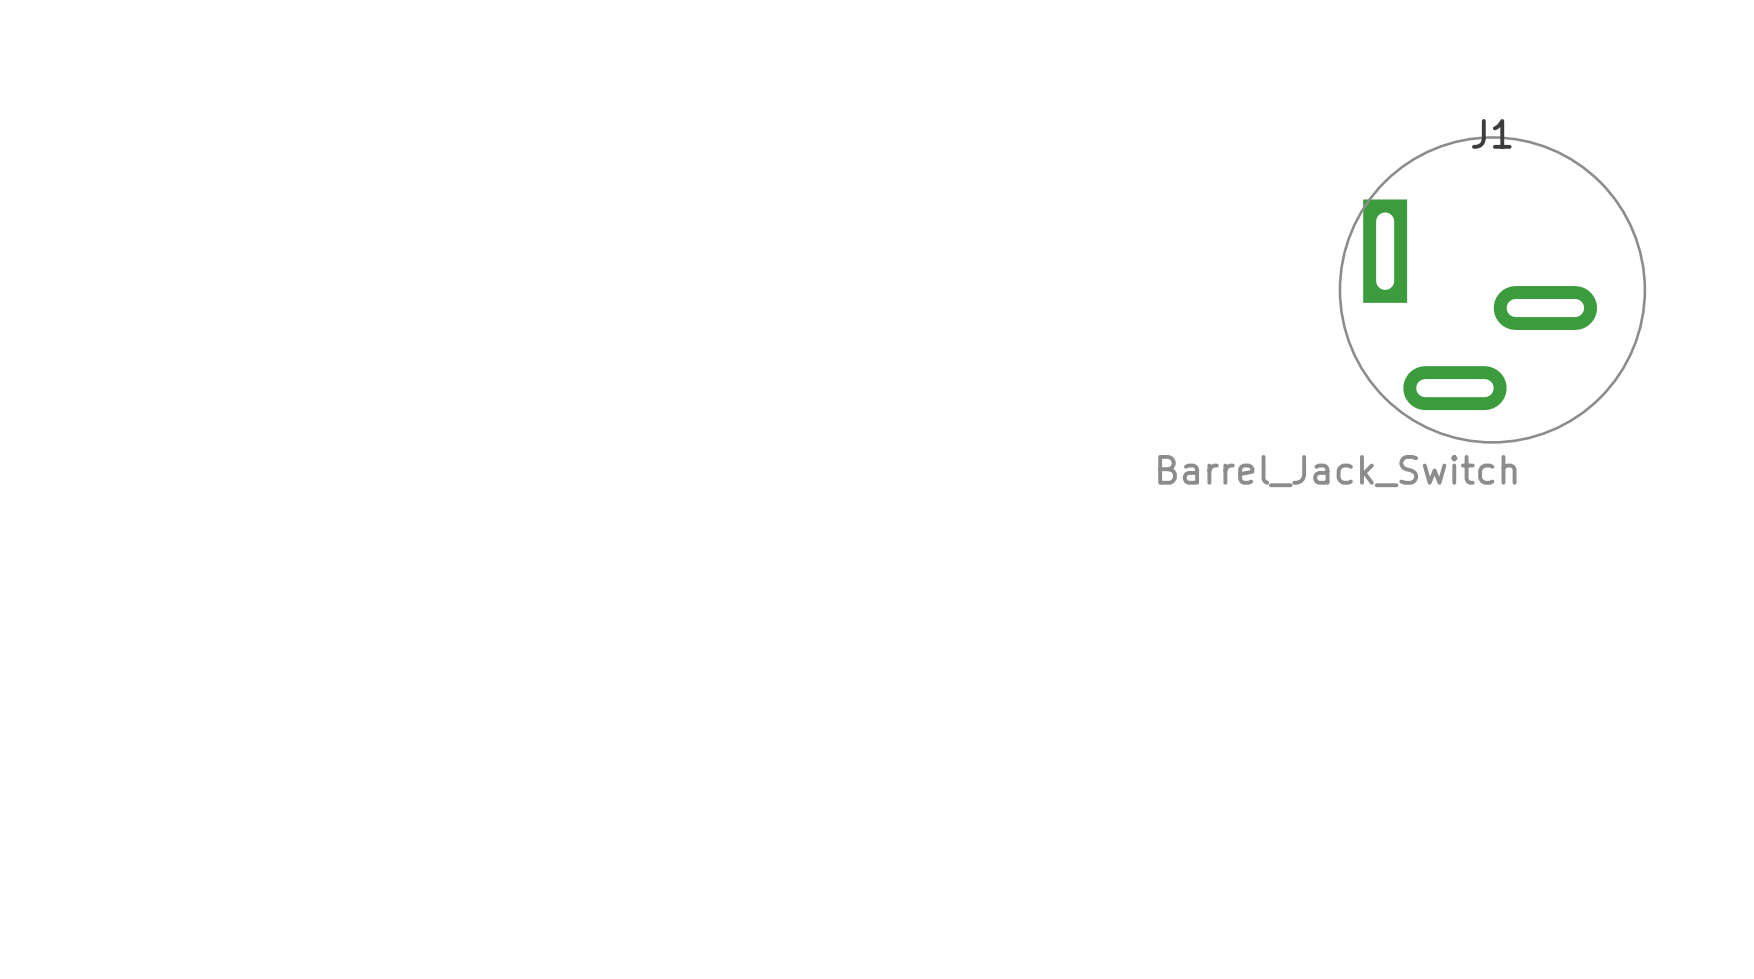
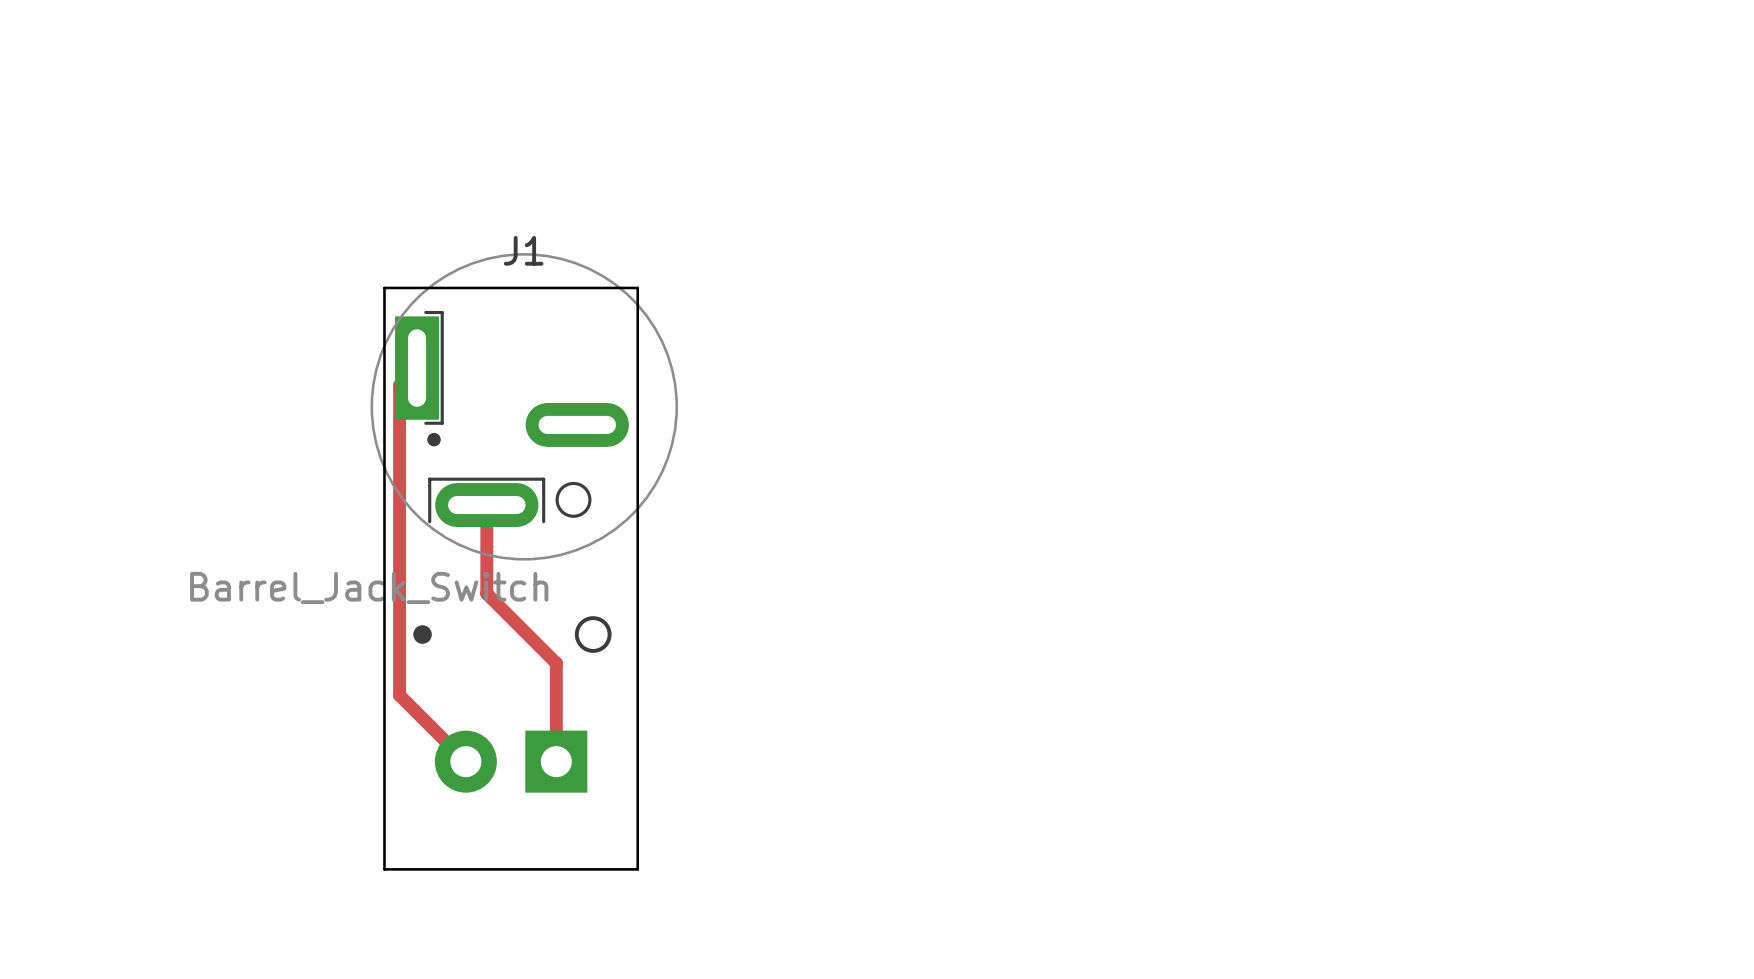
J1 footprint: [1338, 136, 1647, 444] -> [370, 253, 679, 561]
board edge: none -> (384, 287) (637, 287) (637, 869) (384, 869) (384, 287)
track: none -> (417, 368) (399, 385) (399, 695) (465, 761)
track: none -> (486, 505) (486, 593) (556, 663) (556, 761)
drawing: none -> [574, 616, 612, 653]
drawing: none -> [413, 625, 432, 644]
part: none -> (511, 761)

